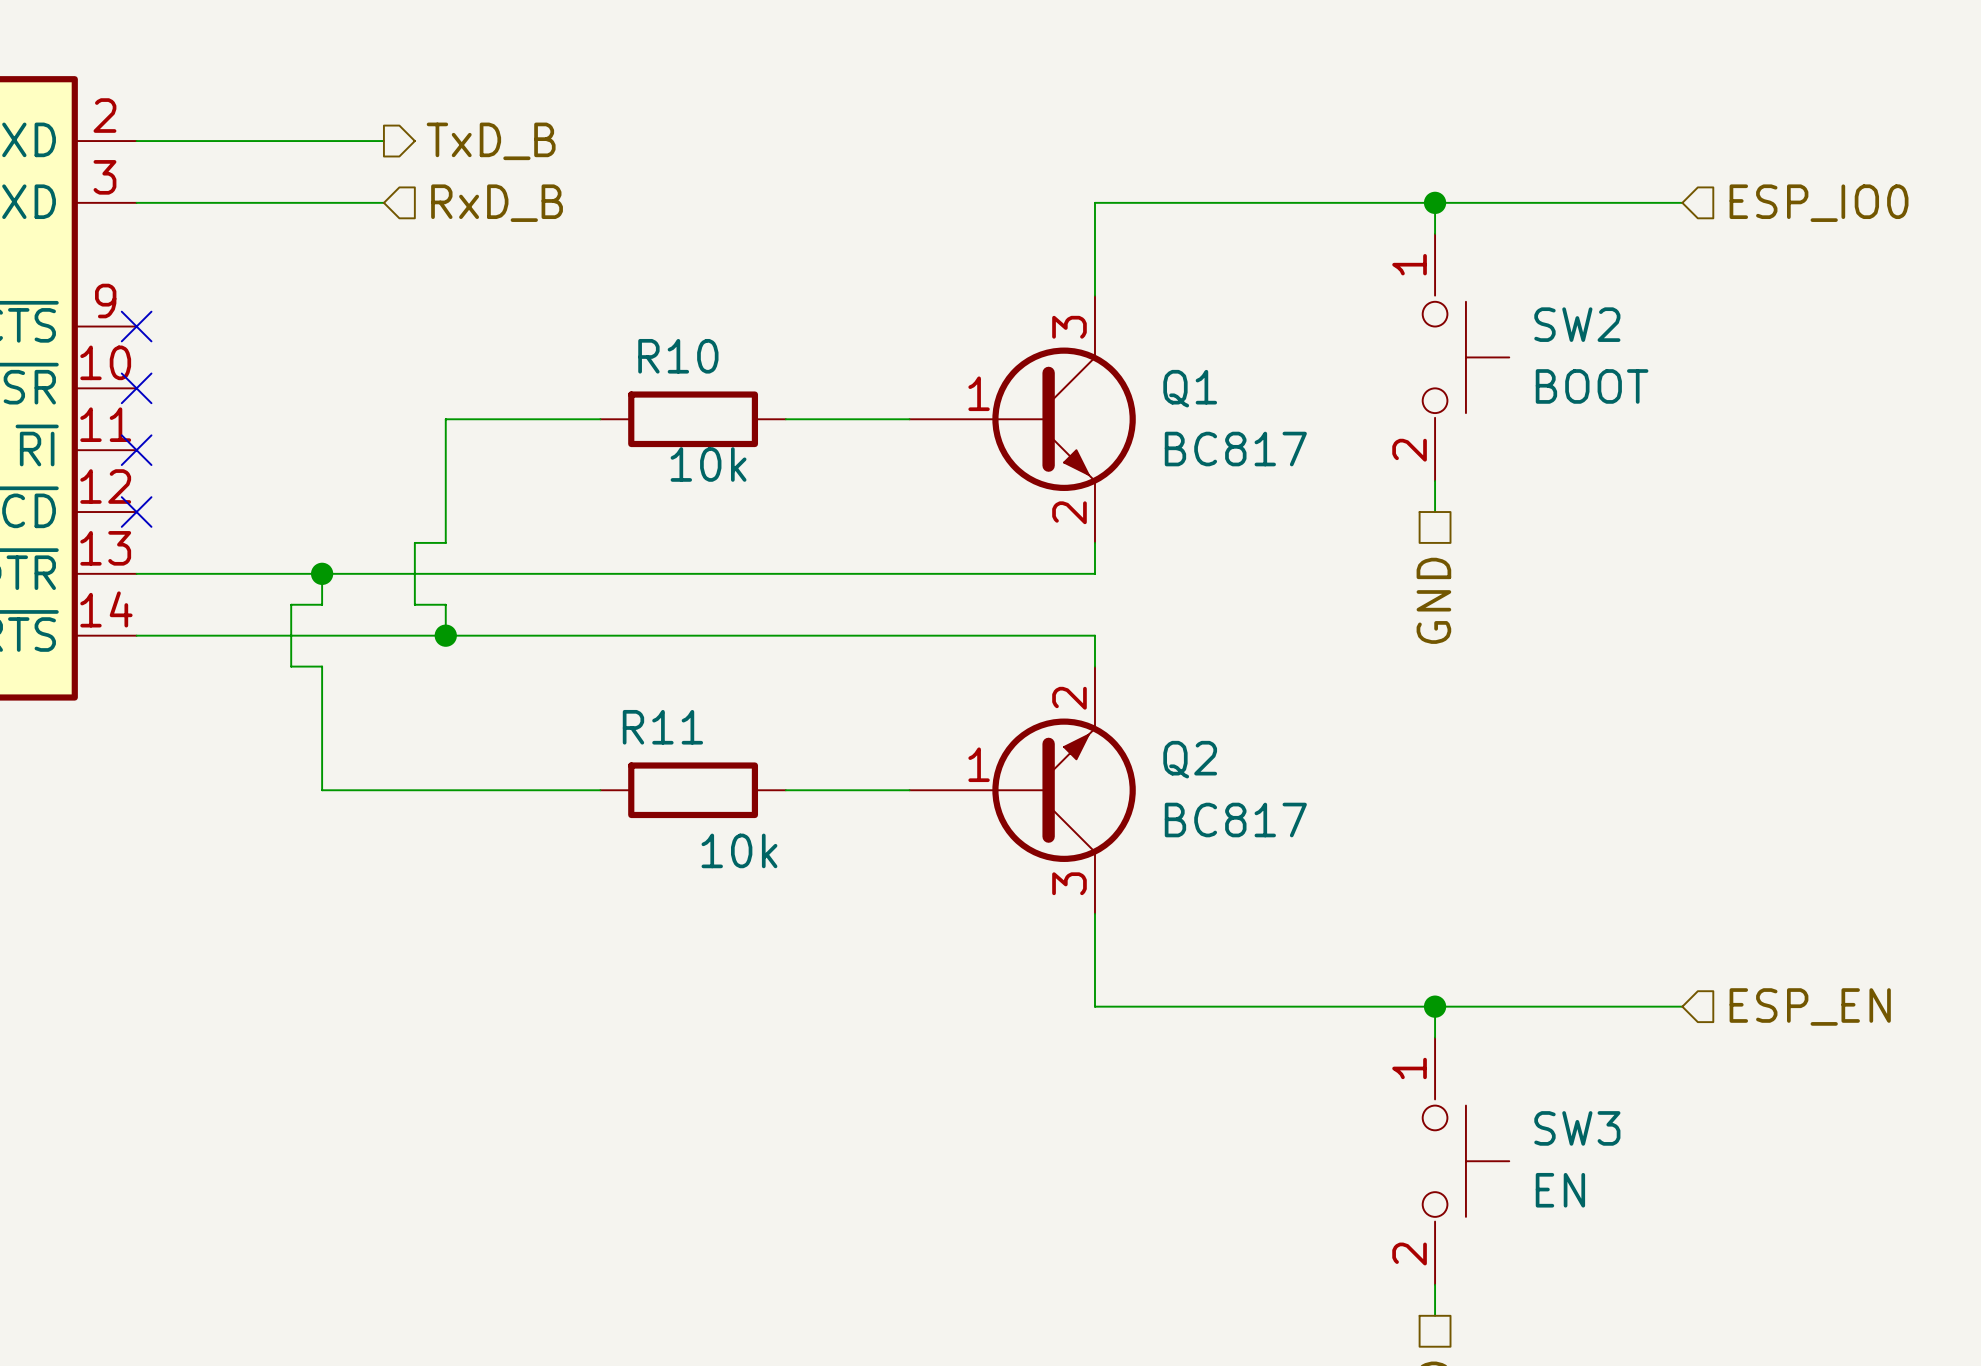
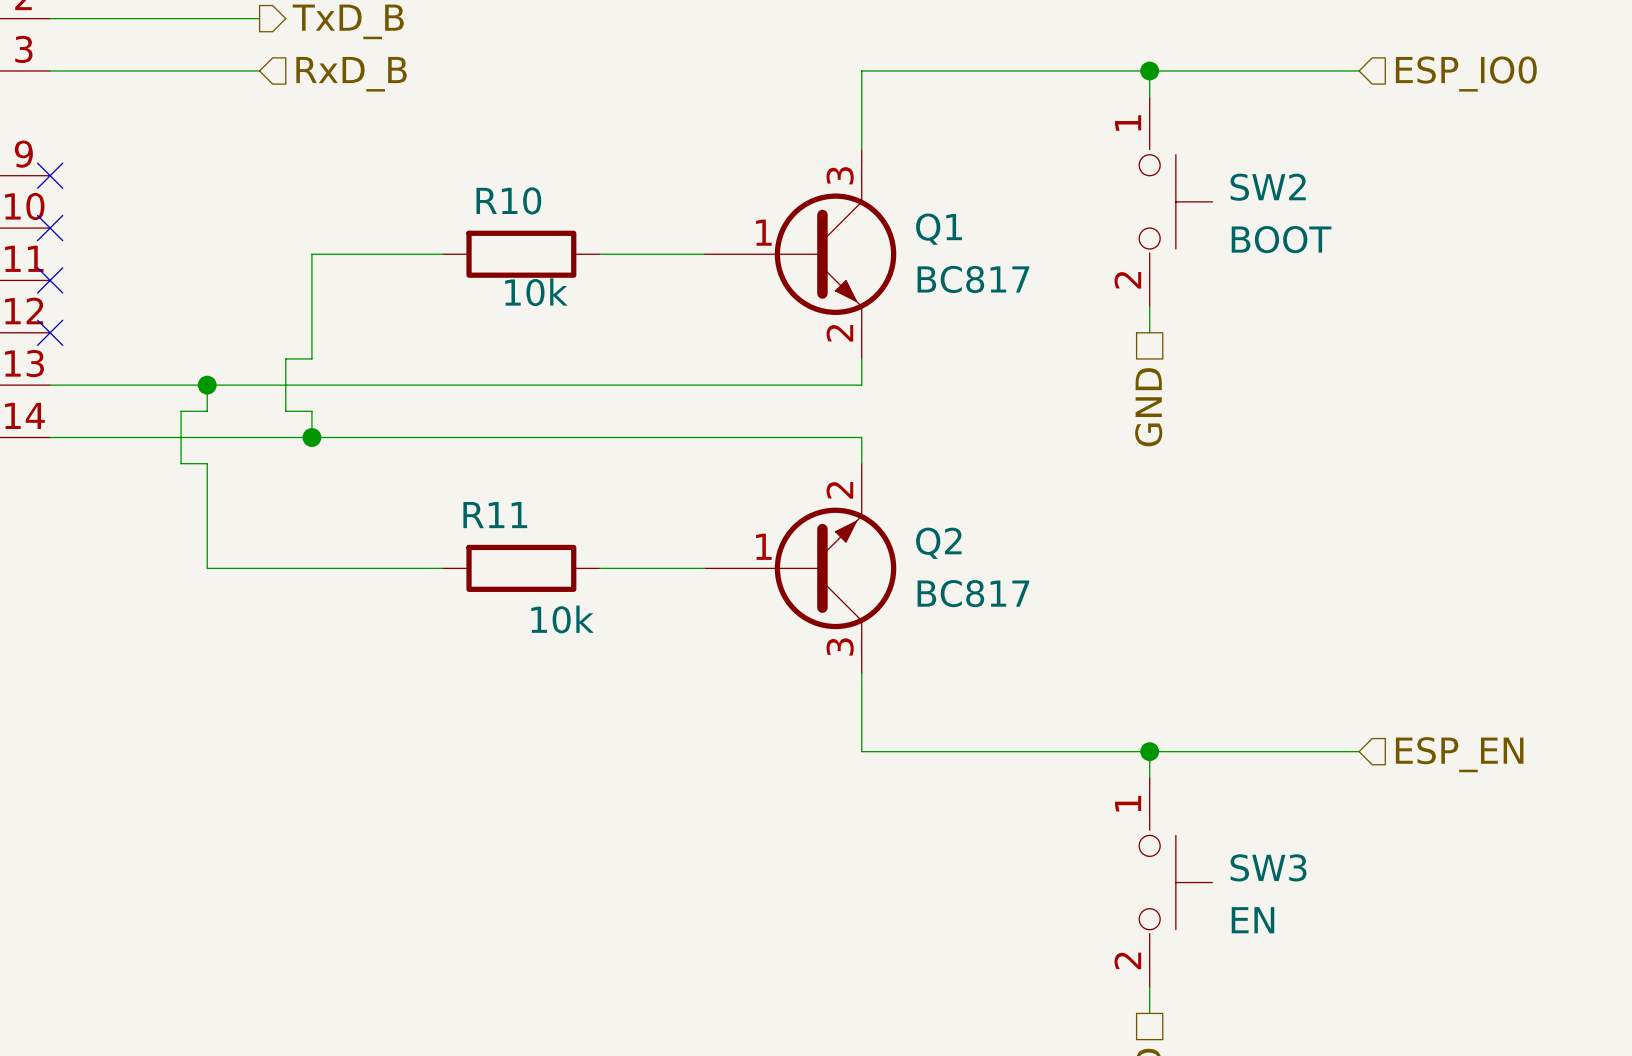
SW2 name position: SW2 (1577, 324) -> SW2 (1268, 187)
SW2 value position: BOOT (1592, 386) -> BOOT (1281, 239)
SW3 name position: SW3 (1577, 1128) -> SW3 (1268, 867)
SW3 value position: EN (1560, 1190) -> EN (1252, 920)

